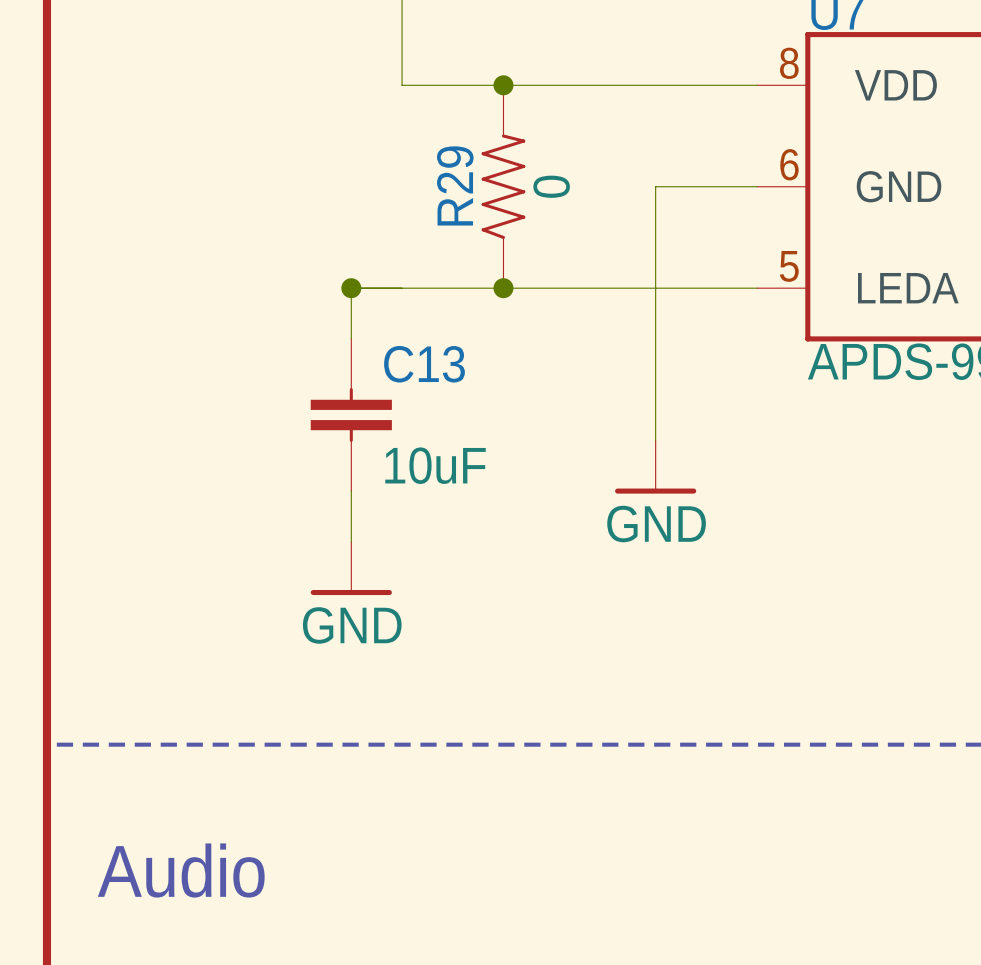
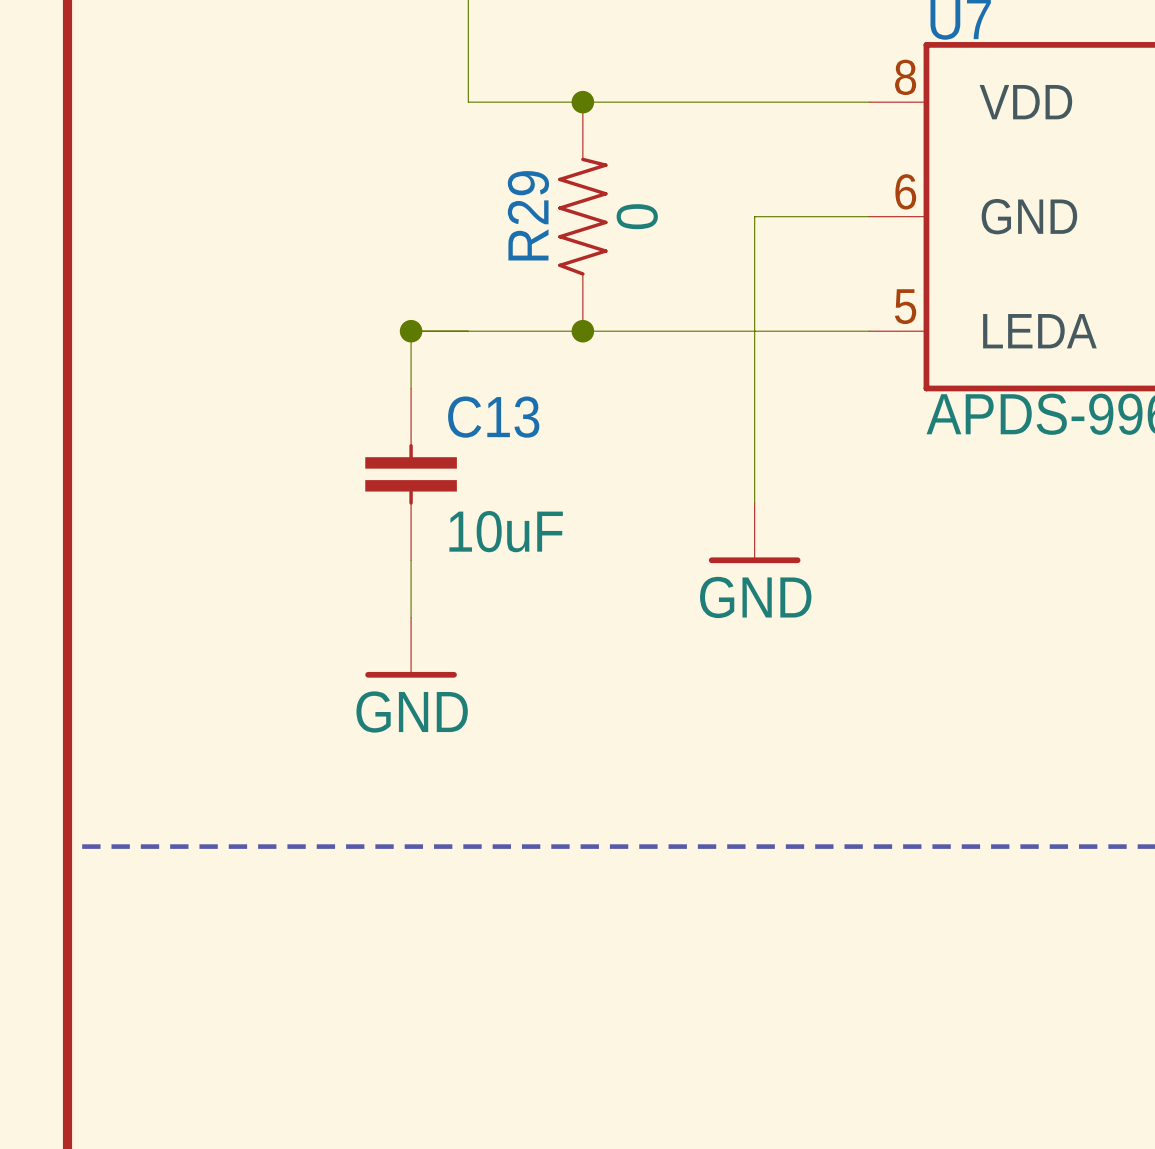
text: Audio (181, 870) -> none

